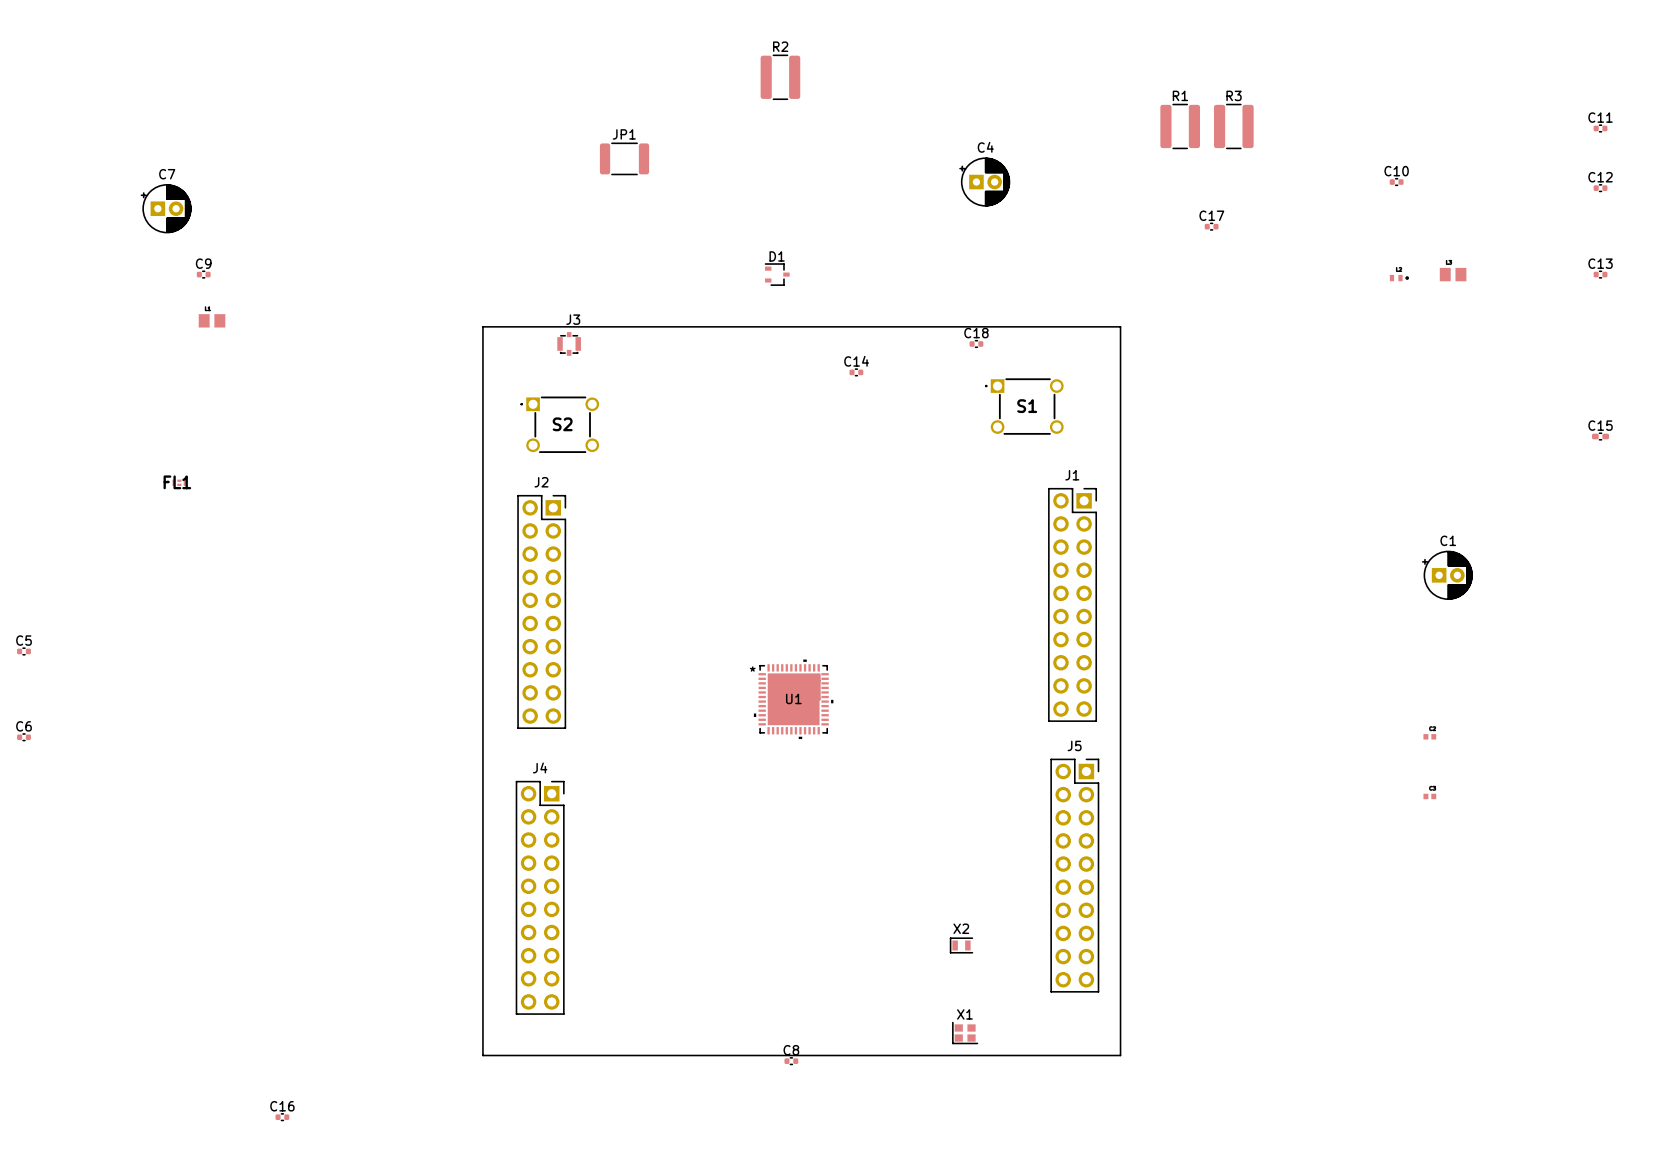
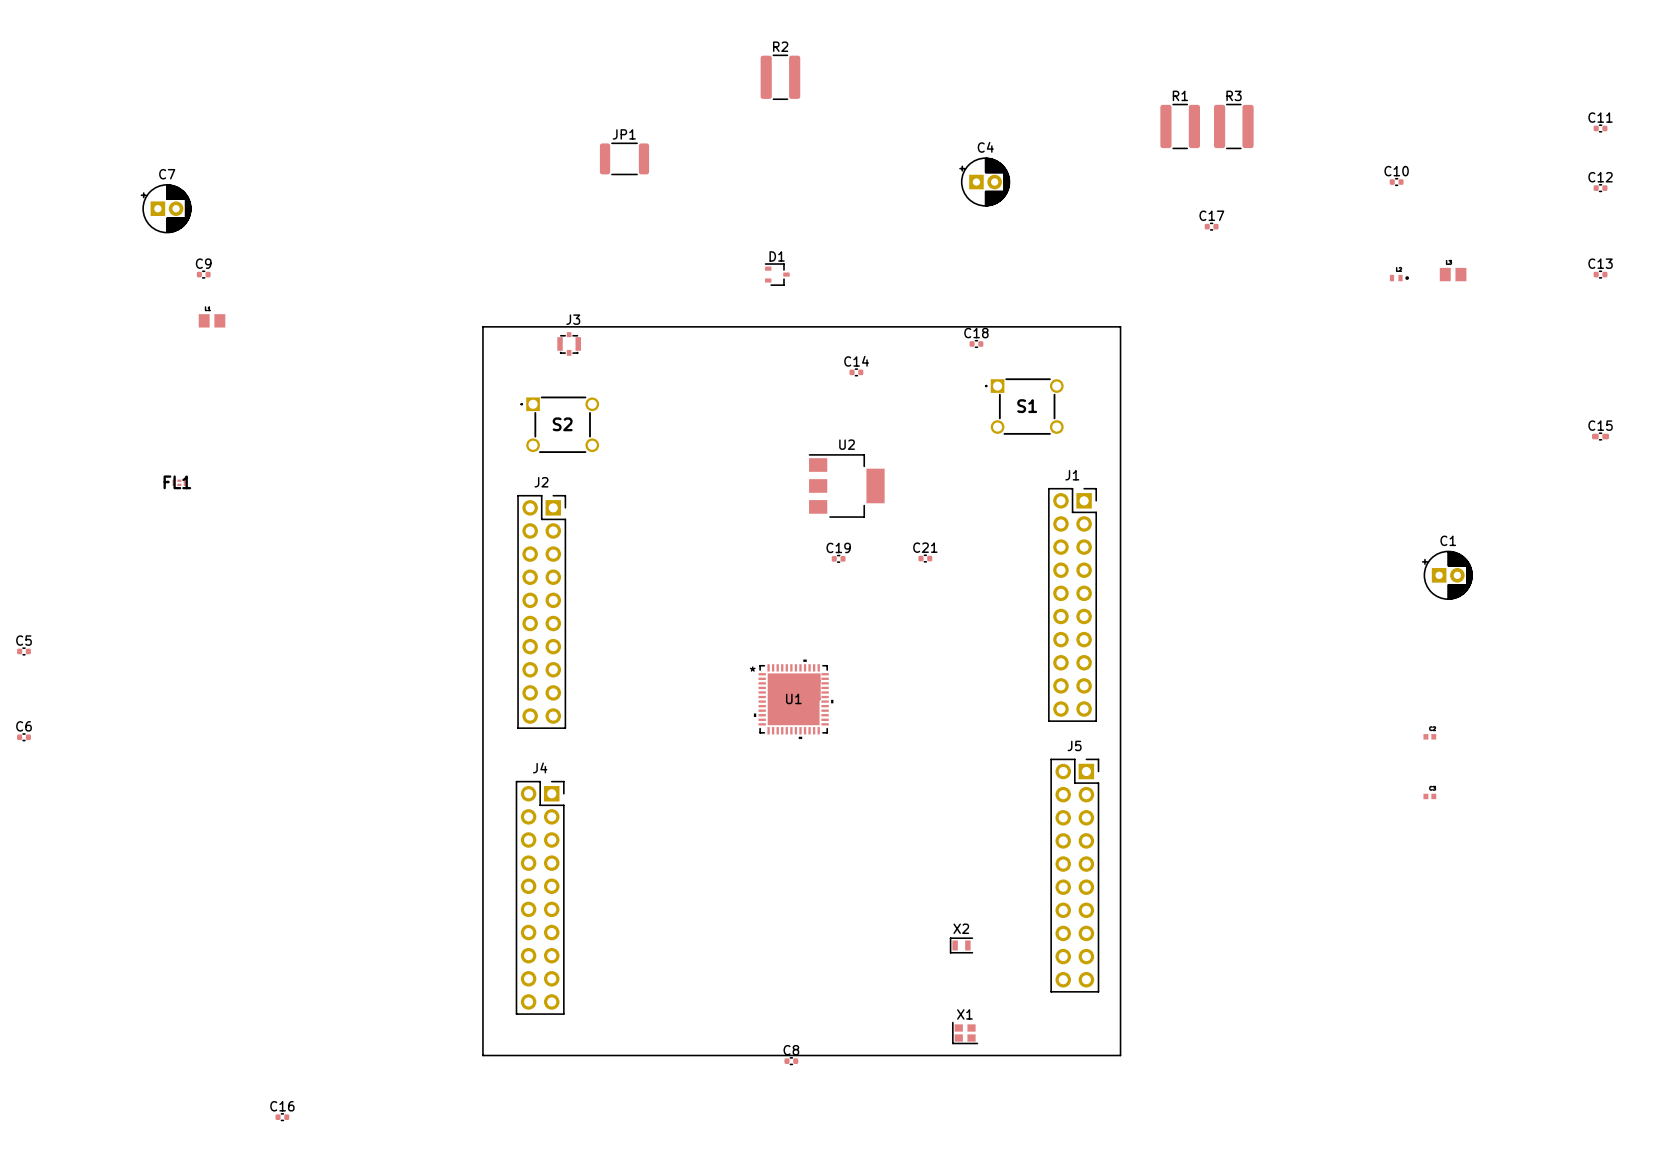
U2: none -> (846, 485)
C19: none -> (838, 558)
C21: none -> (925, 558)

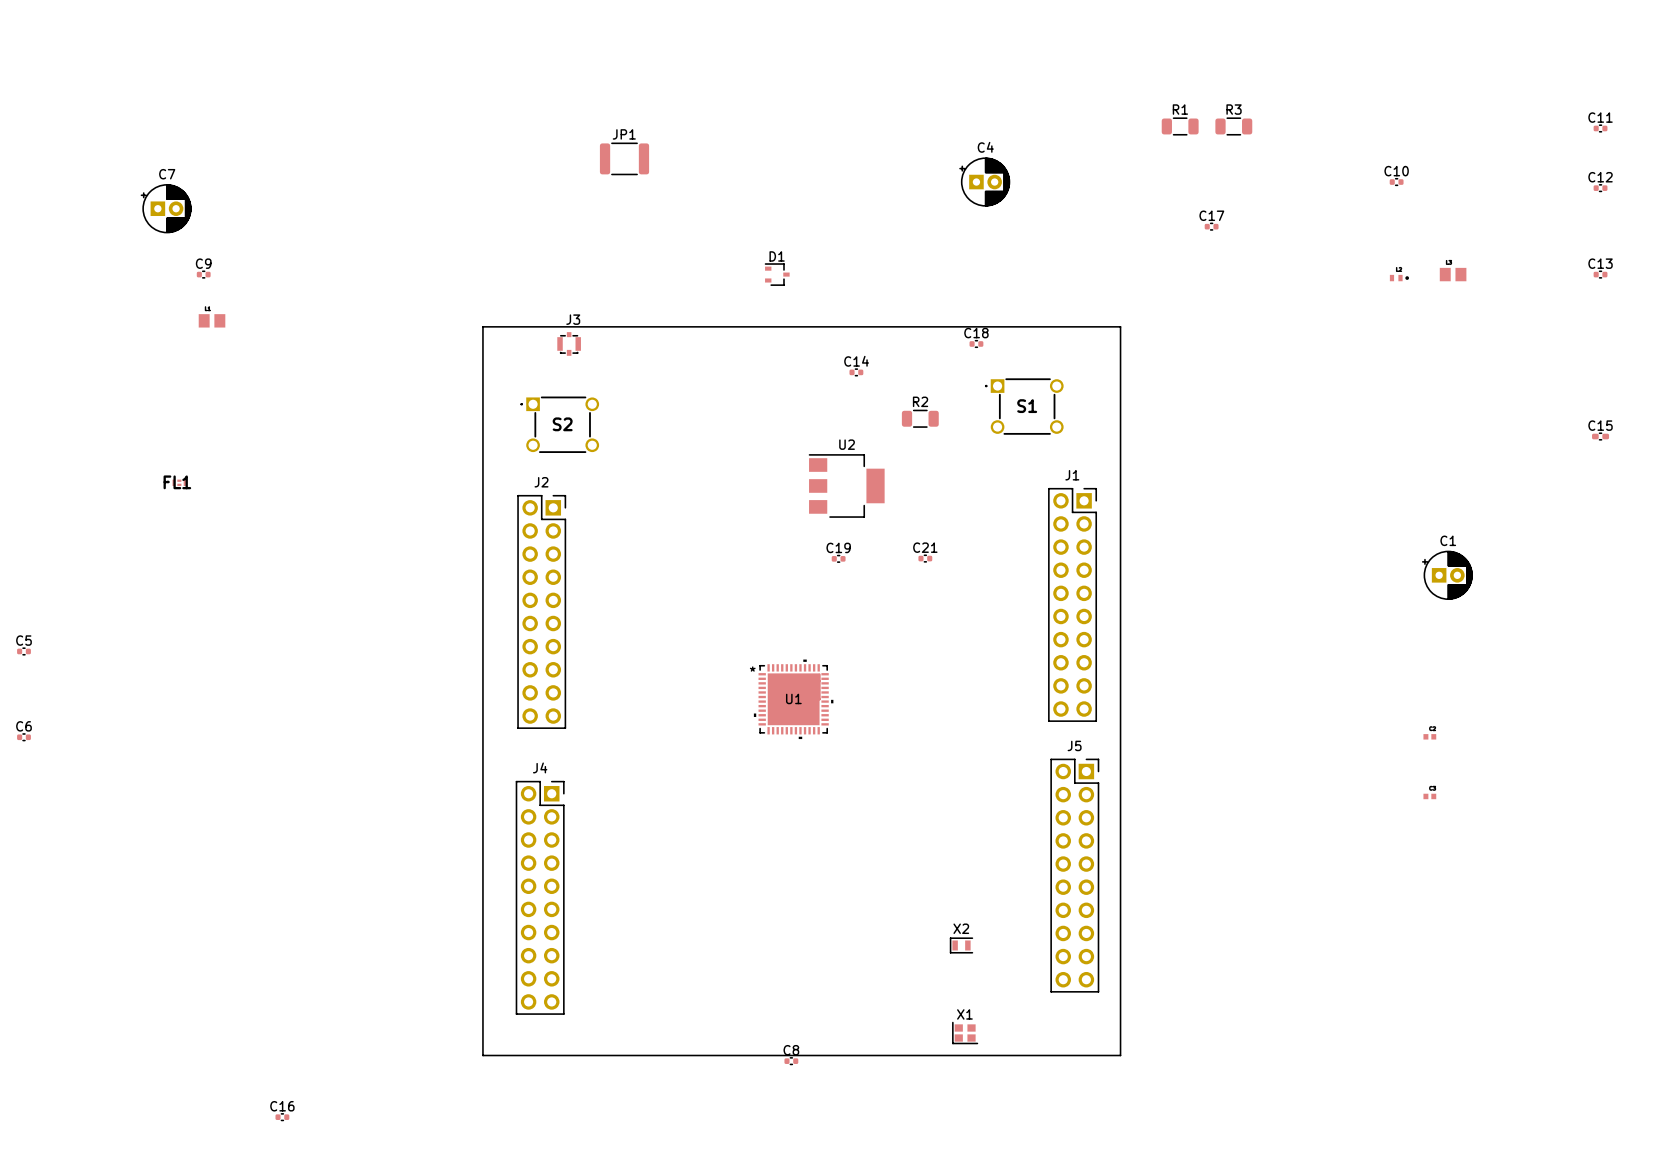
R2 footprint: [760, 54, 801, 100] -> [901, 409, 939, 428]
R1 footprint: [1160, 103, 1200, 149] -> [1161, 117, 1199, 136]
R3 footprint: [1214, 103, 1254, 149] -> [1215, 117, 1253, 136]

